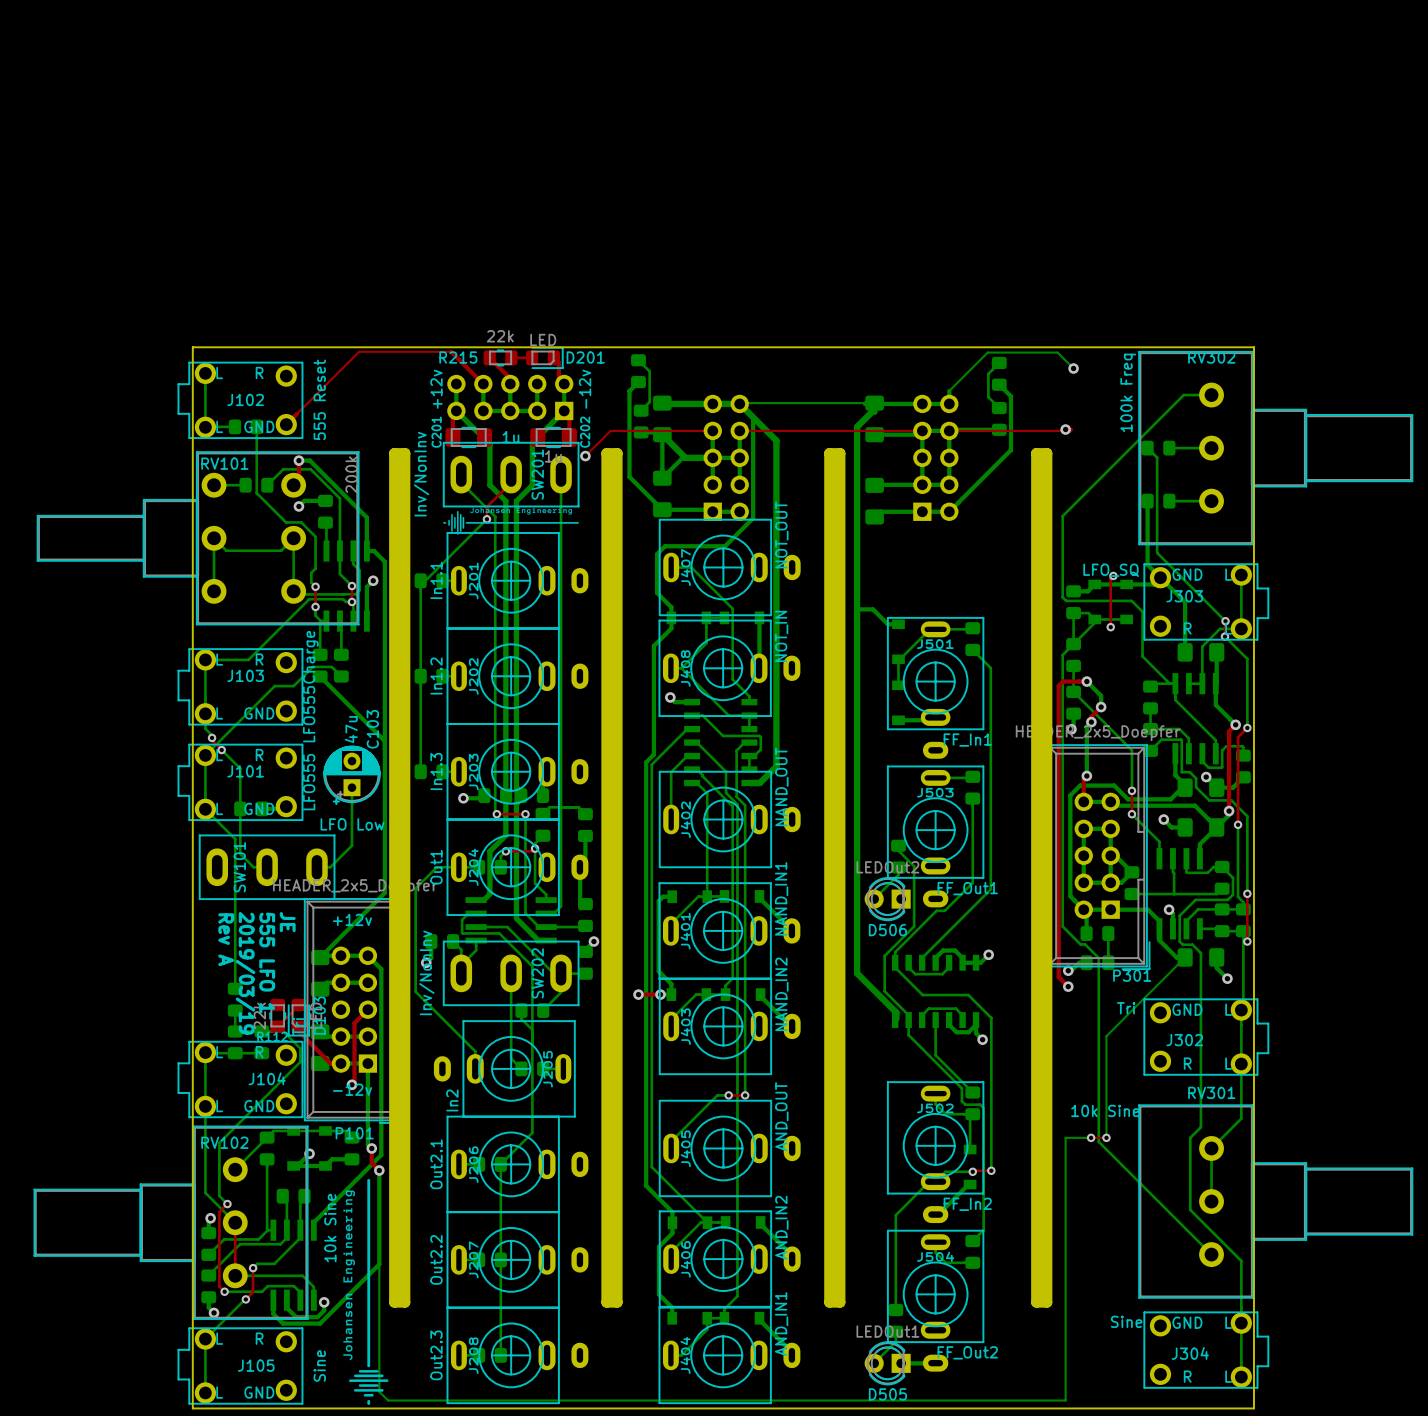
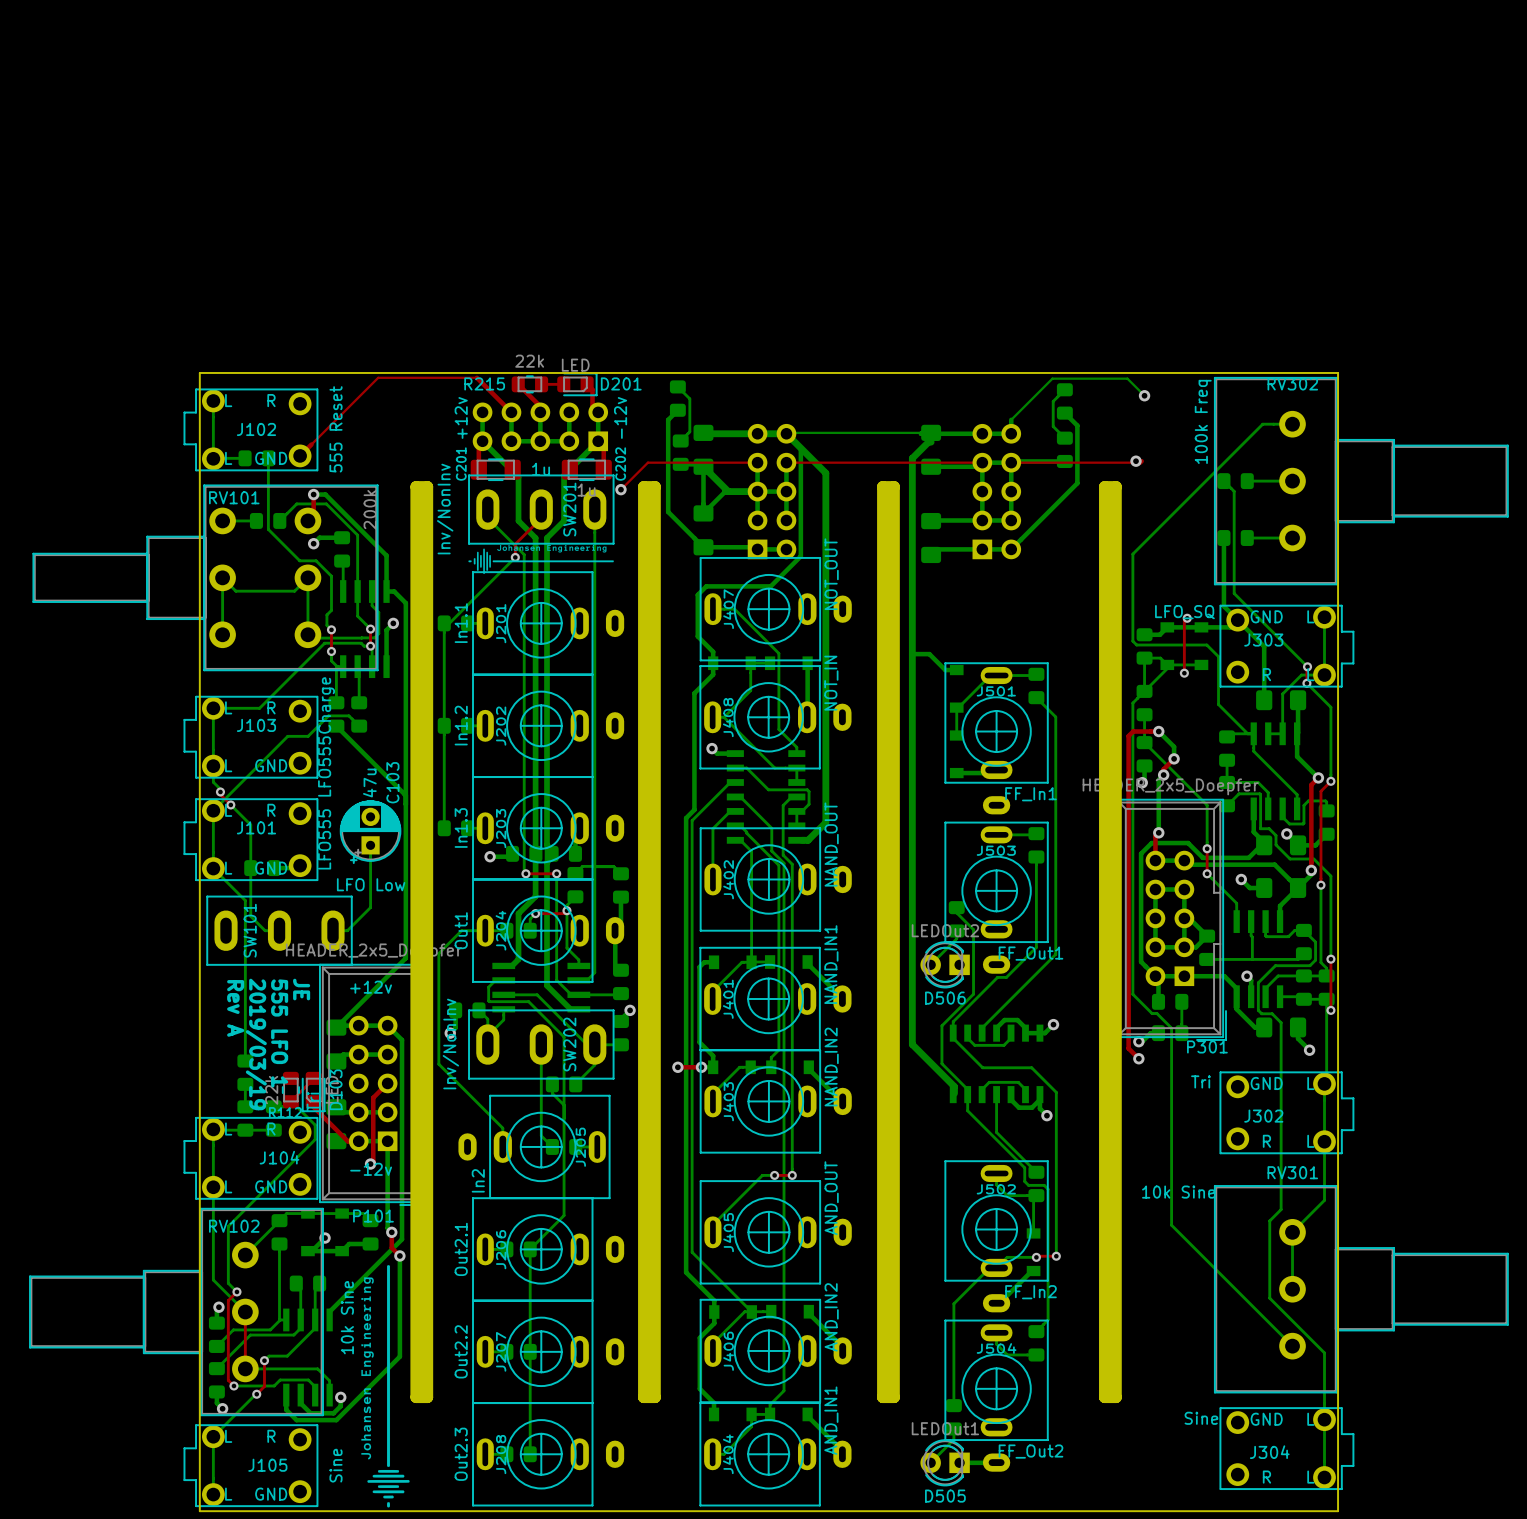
bottom track: (1185, 957) (1106, 1036) (1106, 1137) -> none
bottom track: (1091, 1137) (1065, 1137) (1065, 1400) (388, 1400) (379, 1391) (379, 1264) -> none
top track: (1091, 1137) (1106, 1137) -> none
via: (1091, 1137) -> none
via: (1106, 1137) -> none

